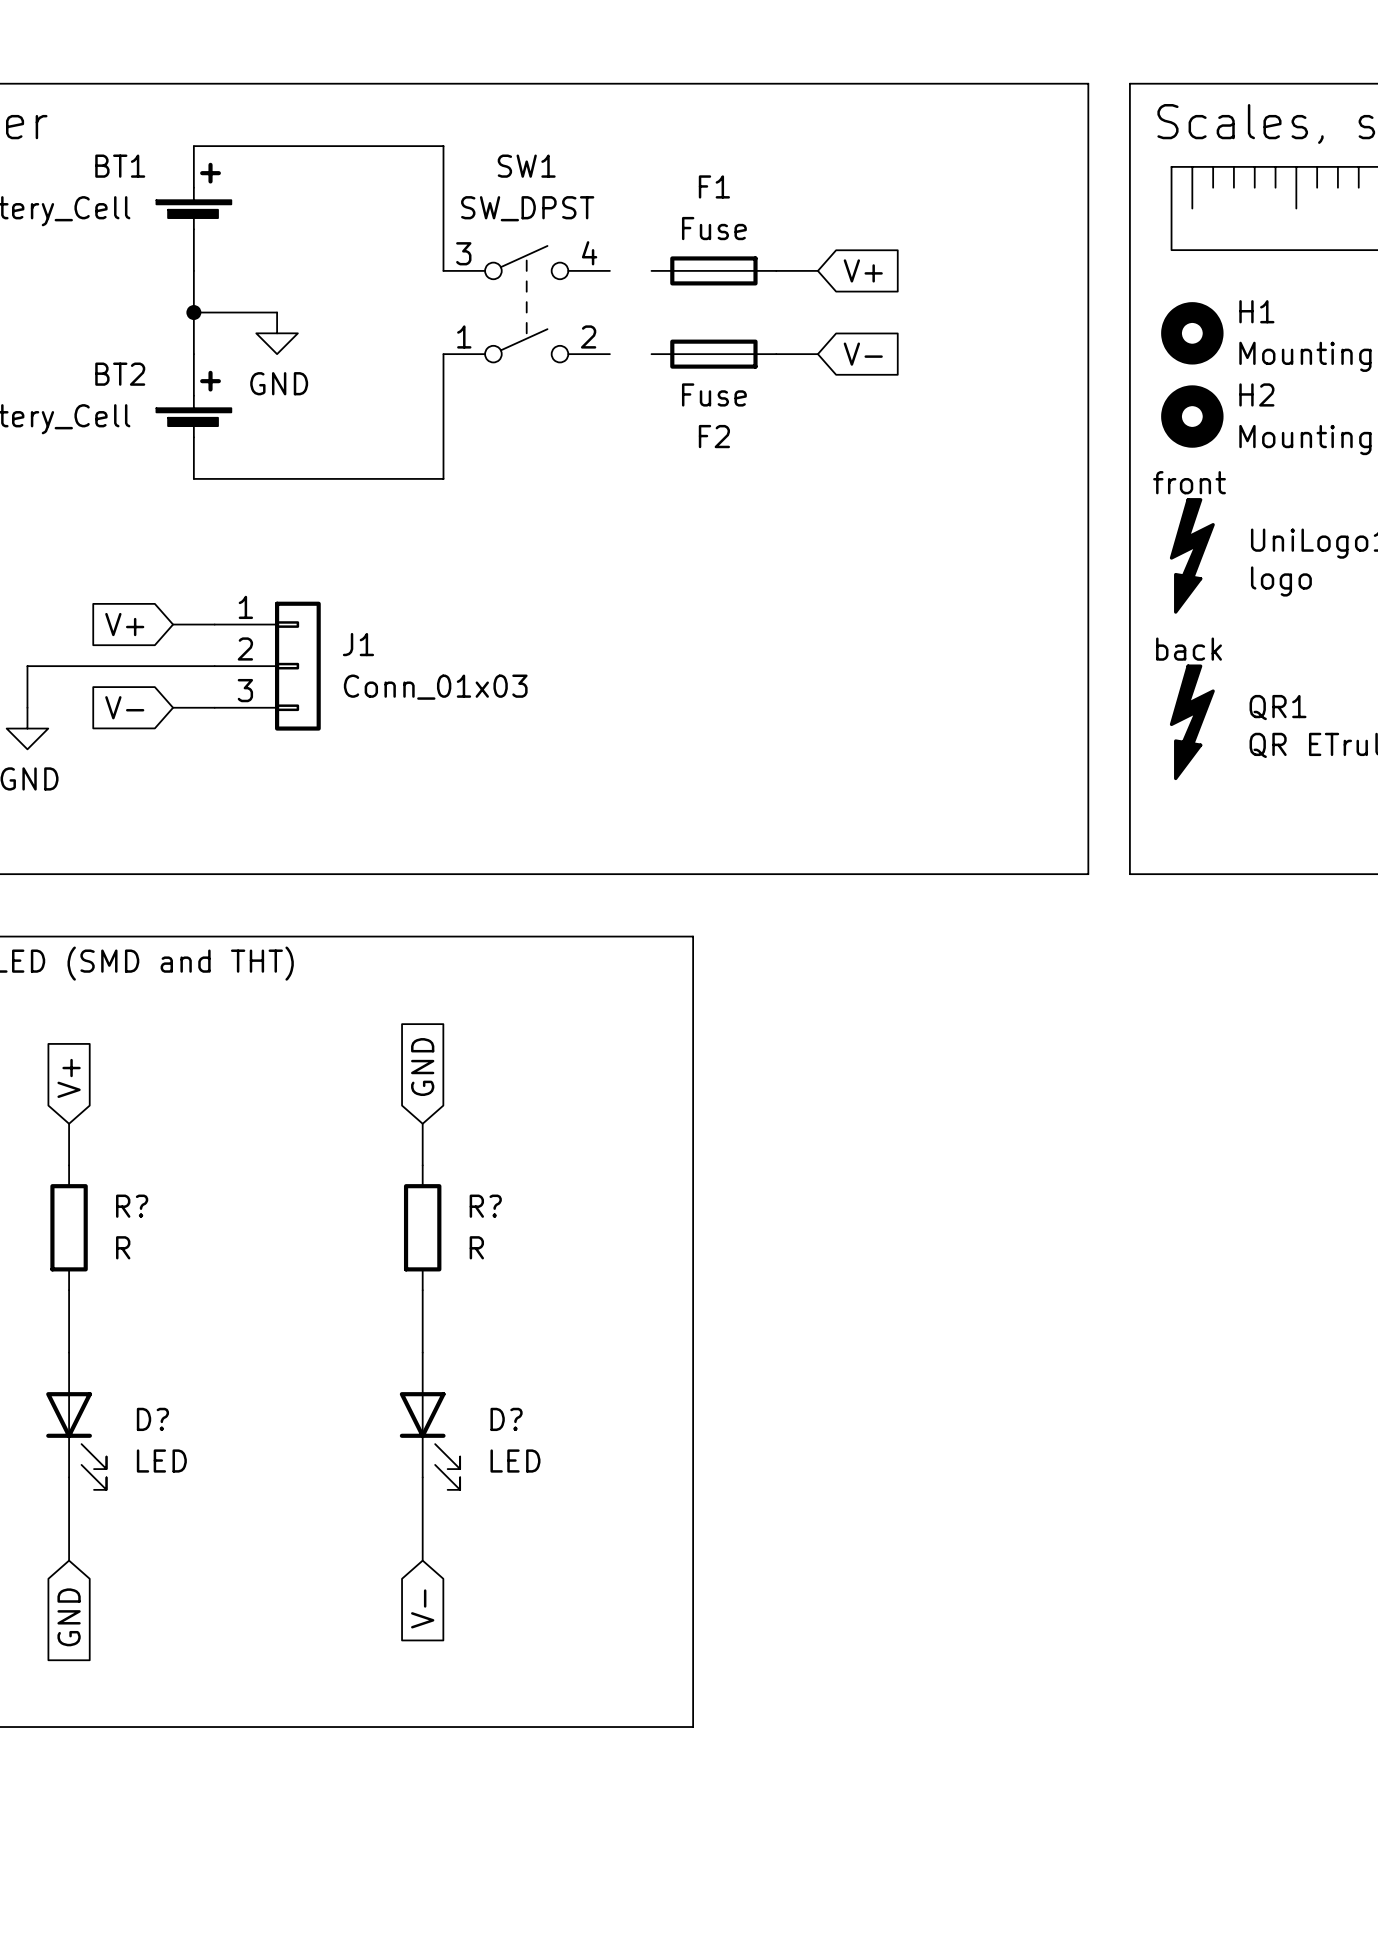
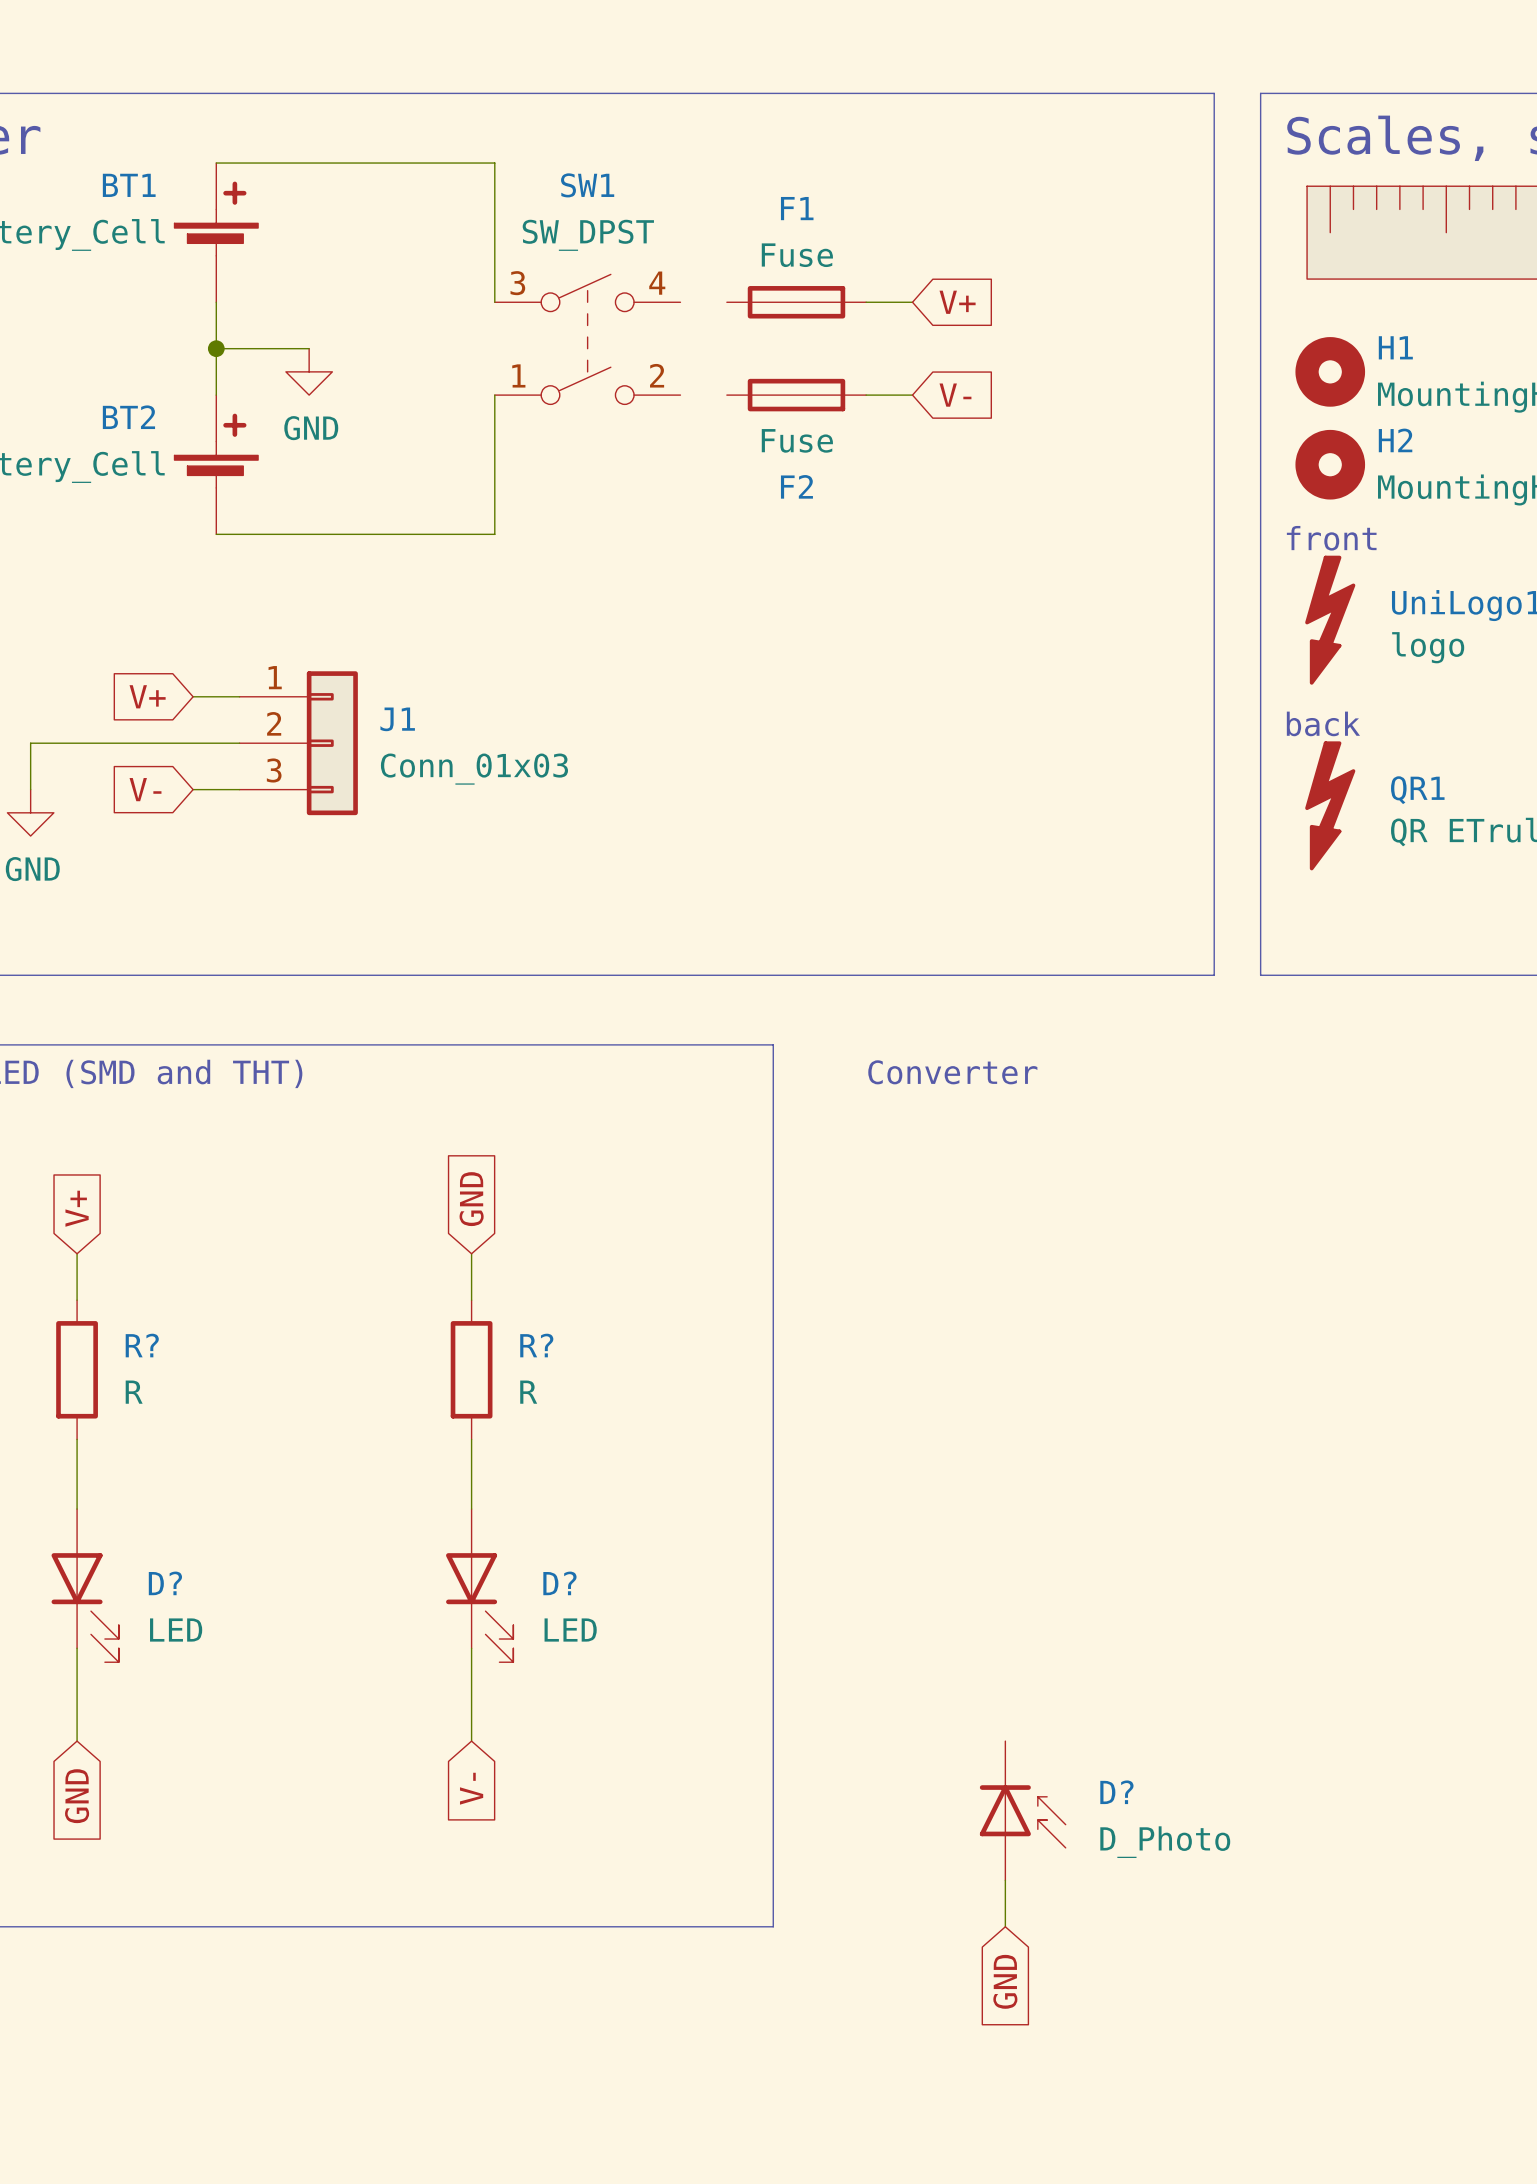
text: none -> Converter (952, 1072)
D?: none -> D_Photo (1022, 1810)
wire: none -> (1005, 1880) (1005, 1926)
global label: none -> GND (1005, 1981)

